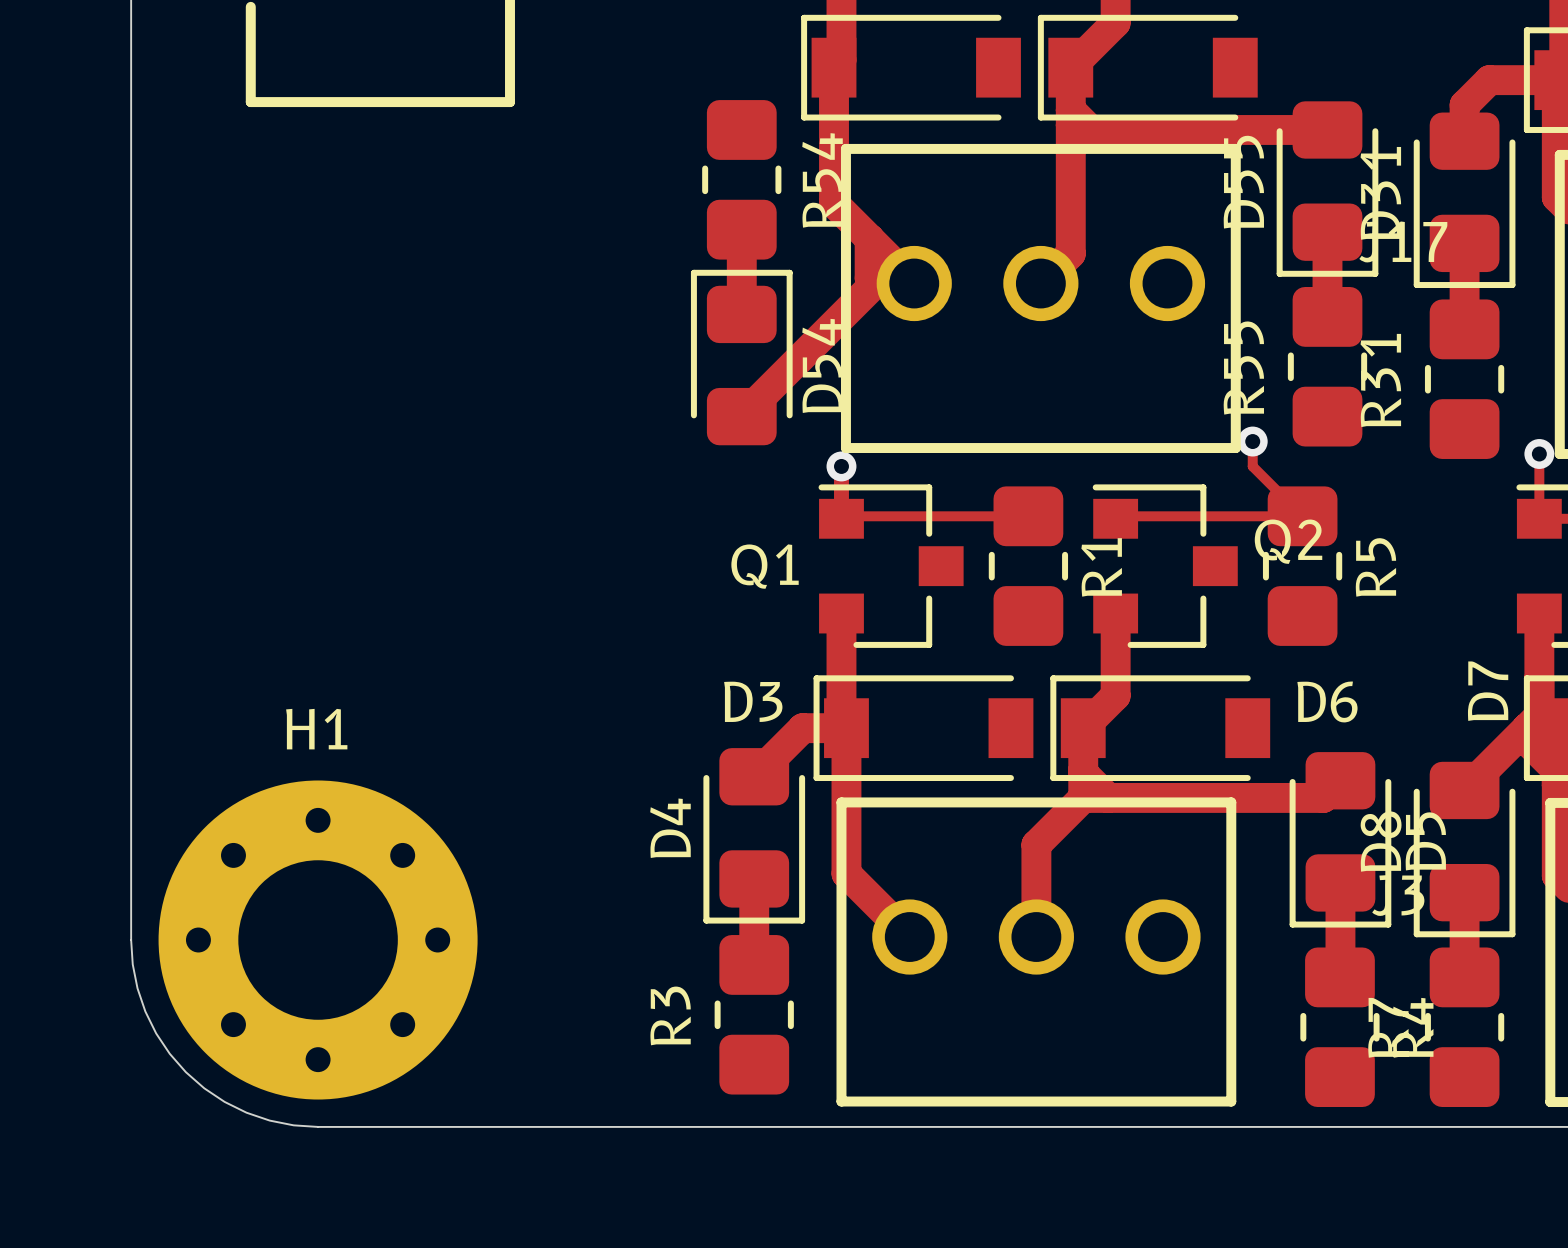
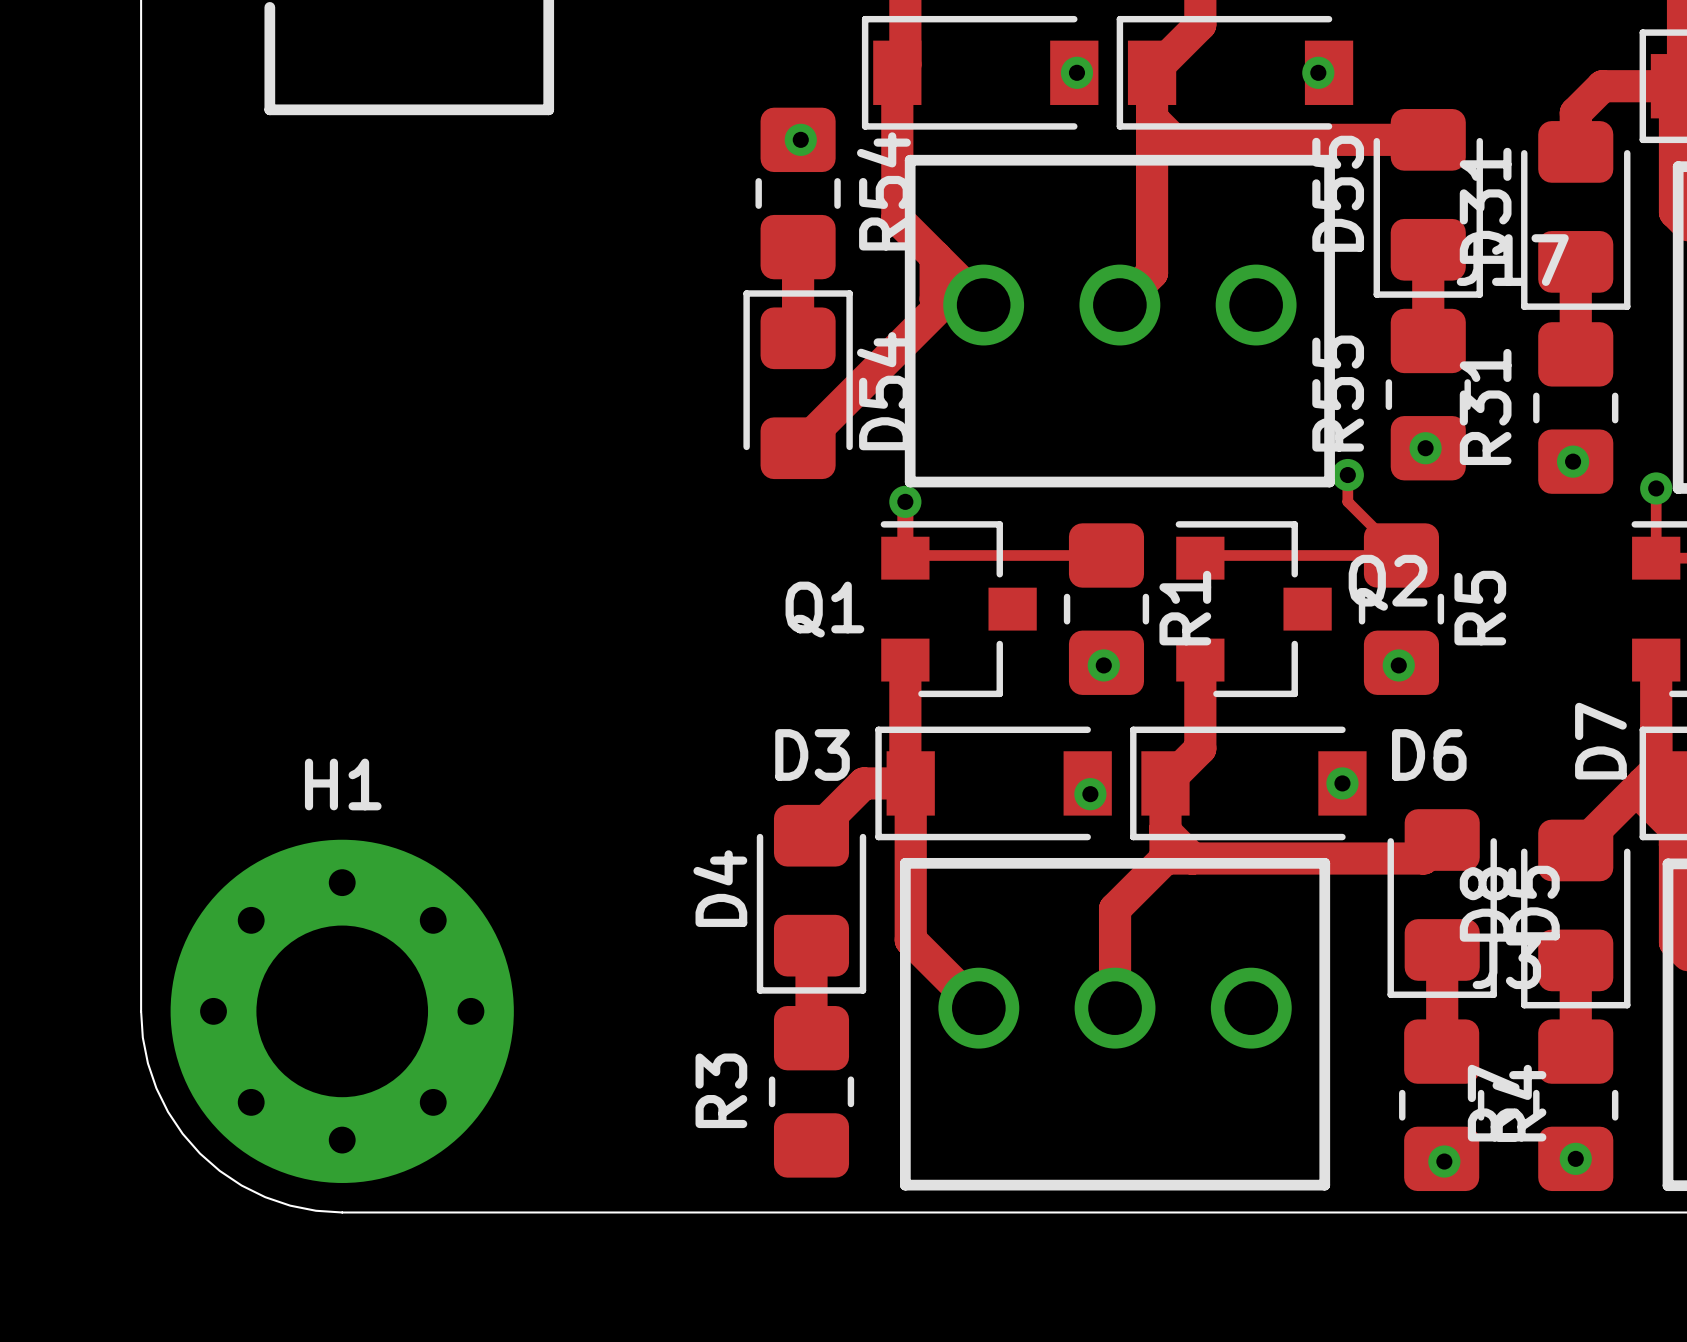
via: none -> (1076, 72)
via: none -> (1318, 72)
via: none -> (800, 139)
via: none -> (1425, 448)
via: none -> (1573, 461)
via: none -> (1103, 665)
via: none -> (1398, 665)
via: none -> (1342, 783)
via: none -> (1090, 794)
via: none -> (1575, 1158)
via: none -> (1444, 1161)

